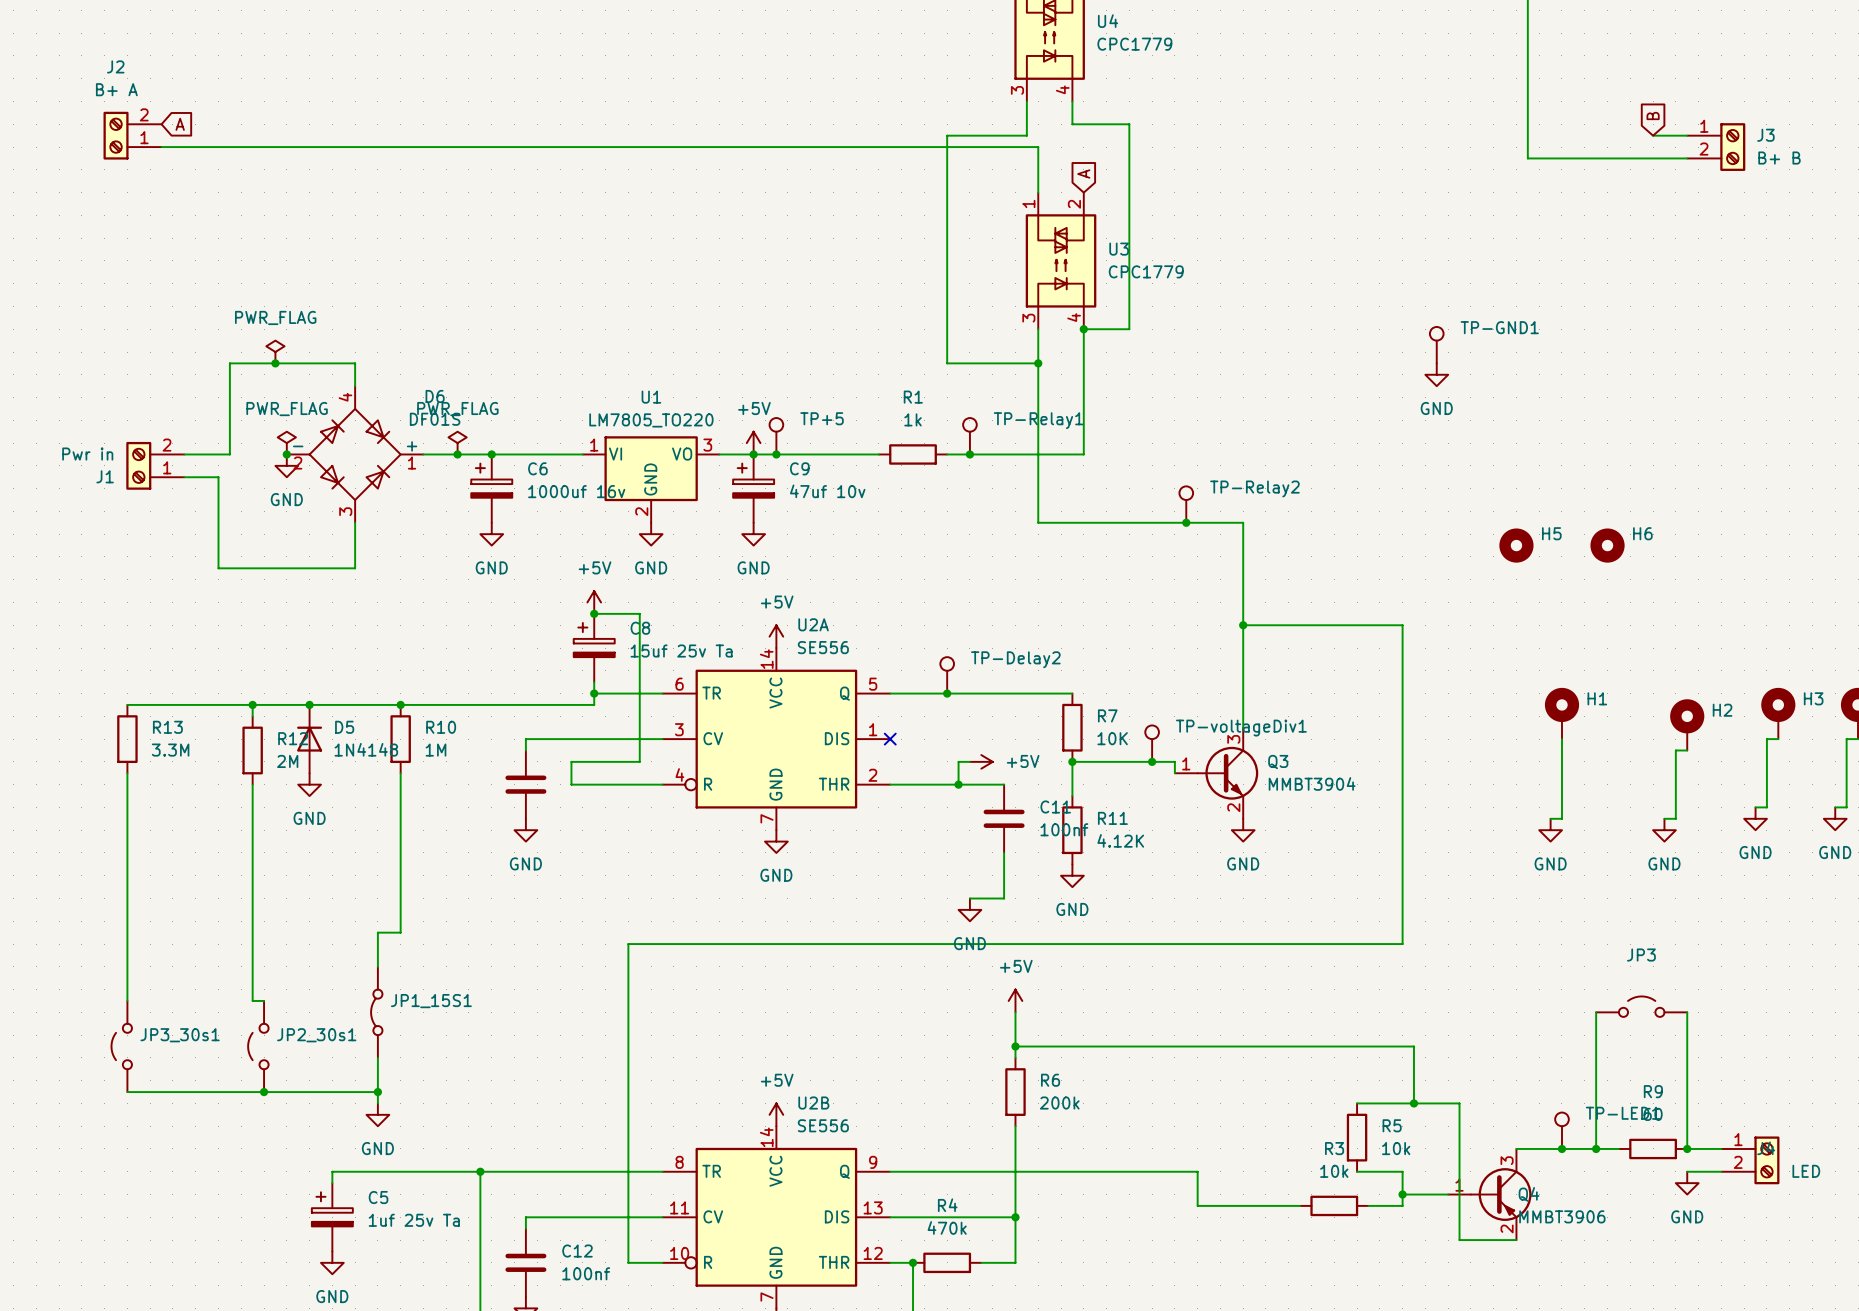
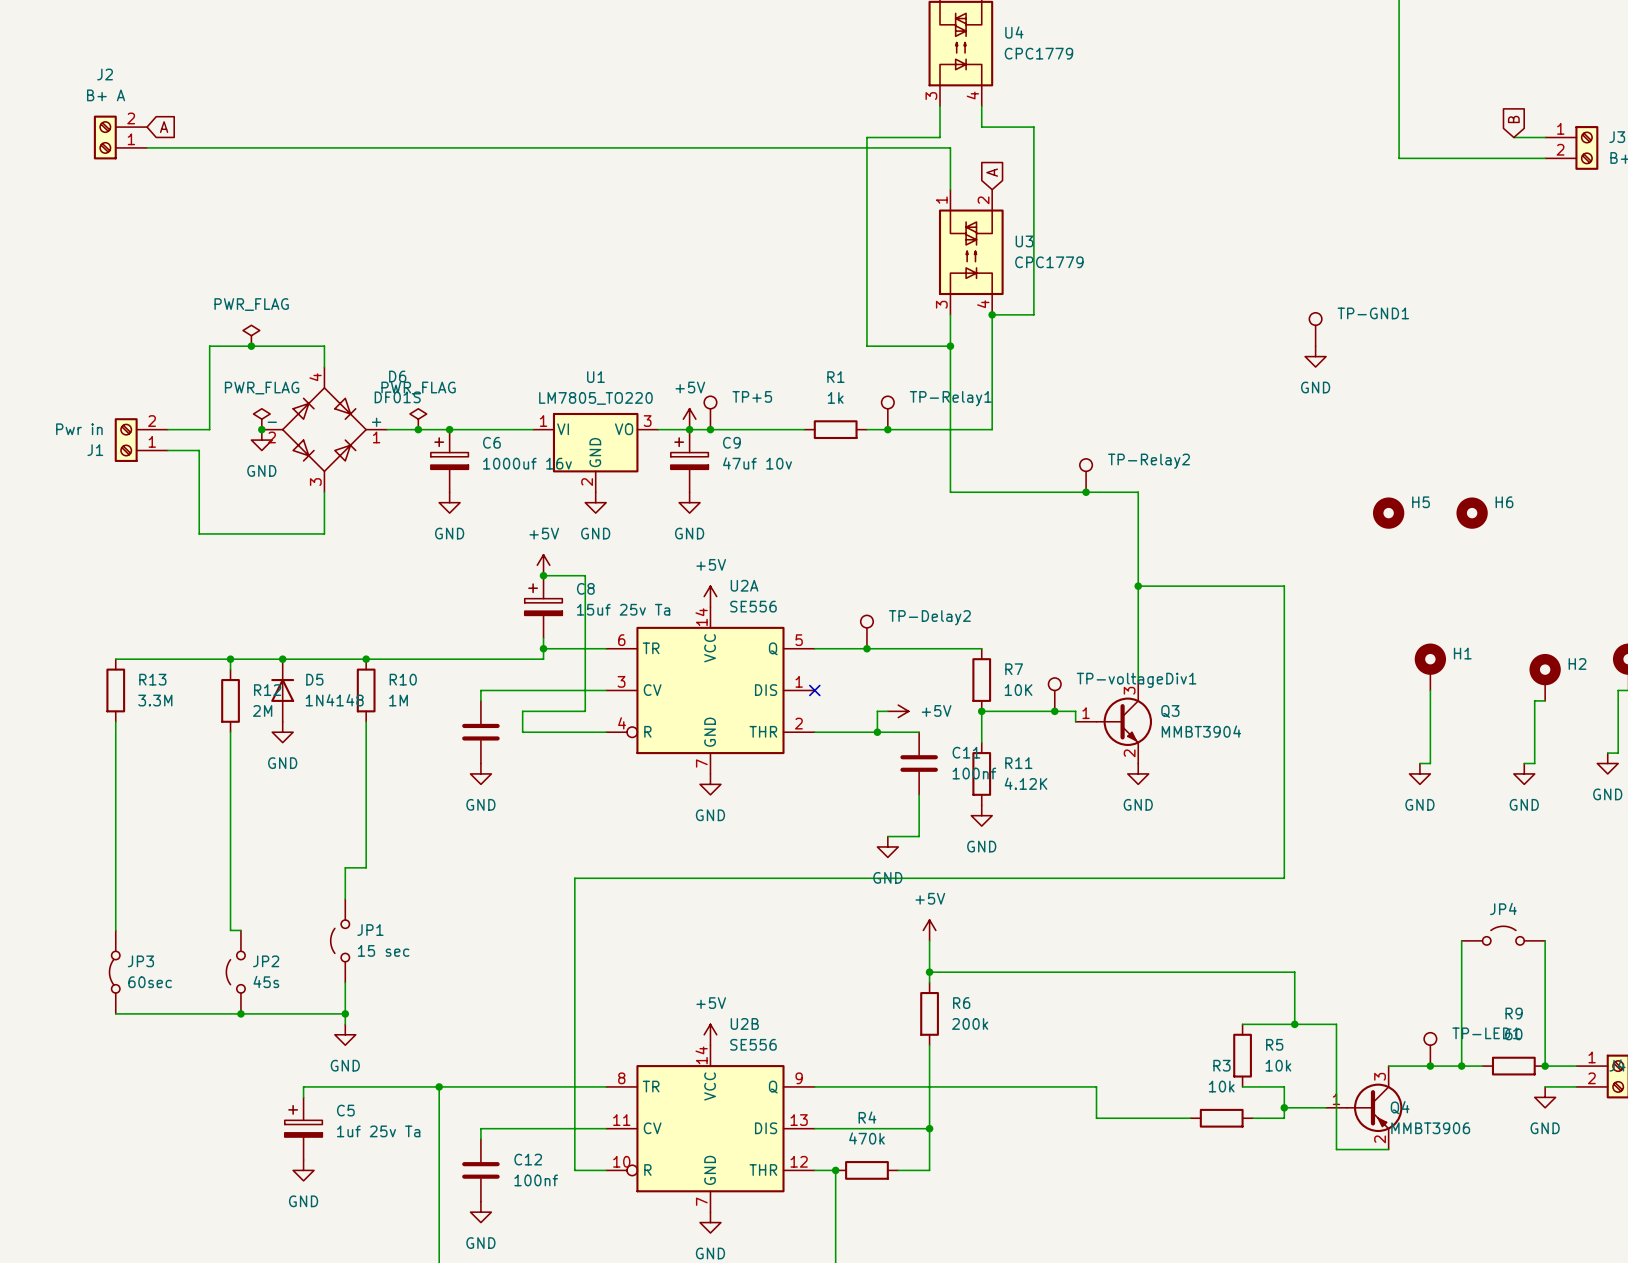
JP3 name: JP3 (1641, 955) -> JP4 (1503, 908)
JP1: none -> 15 sec (340, 940)
JP1_15S1: (376, 1012) -> none
JP2_30s1 name: JP2_30s1 (316, 1035) -> JP2 (266, 961)
JP3_30s1: (121, 1046) -> none
JP3: none -> 60sec (114, 972)
JP2_30s1 value: none -> 45s (266, 981)

